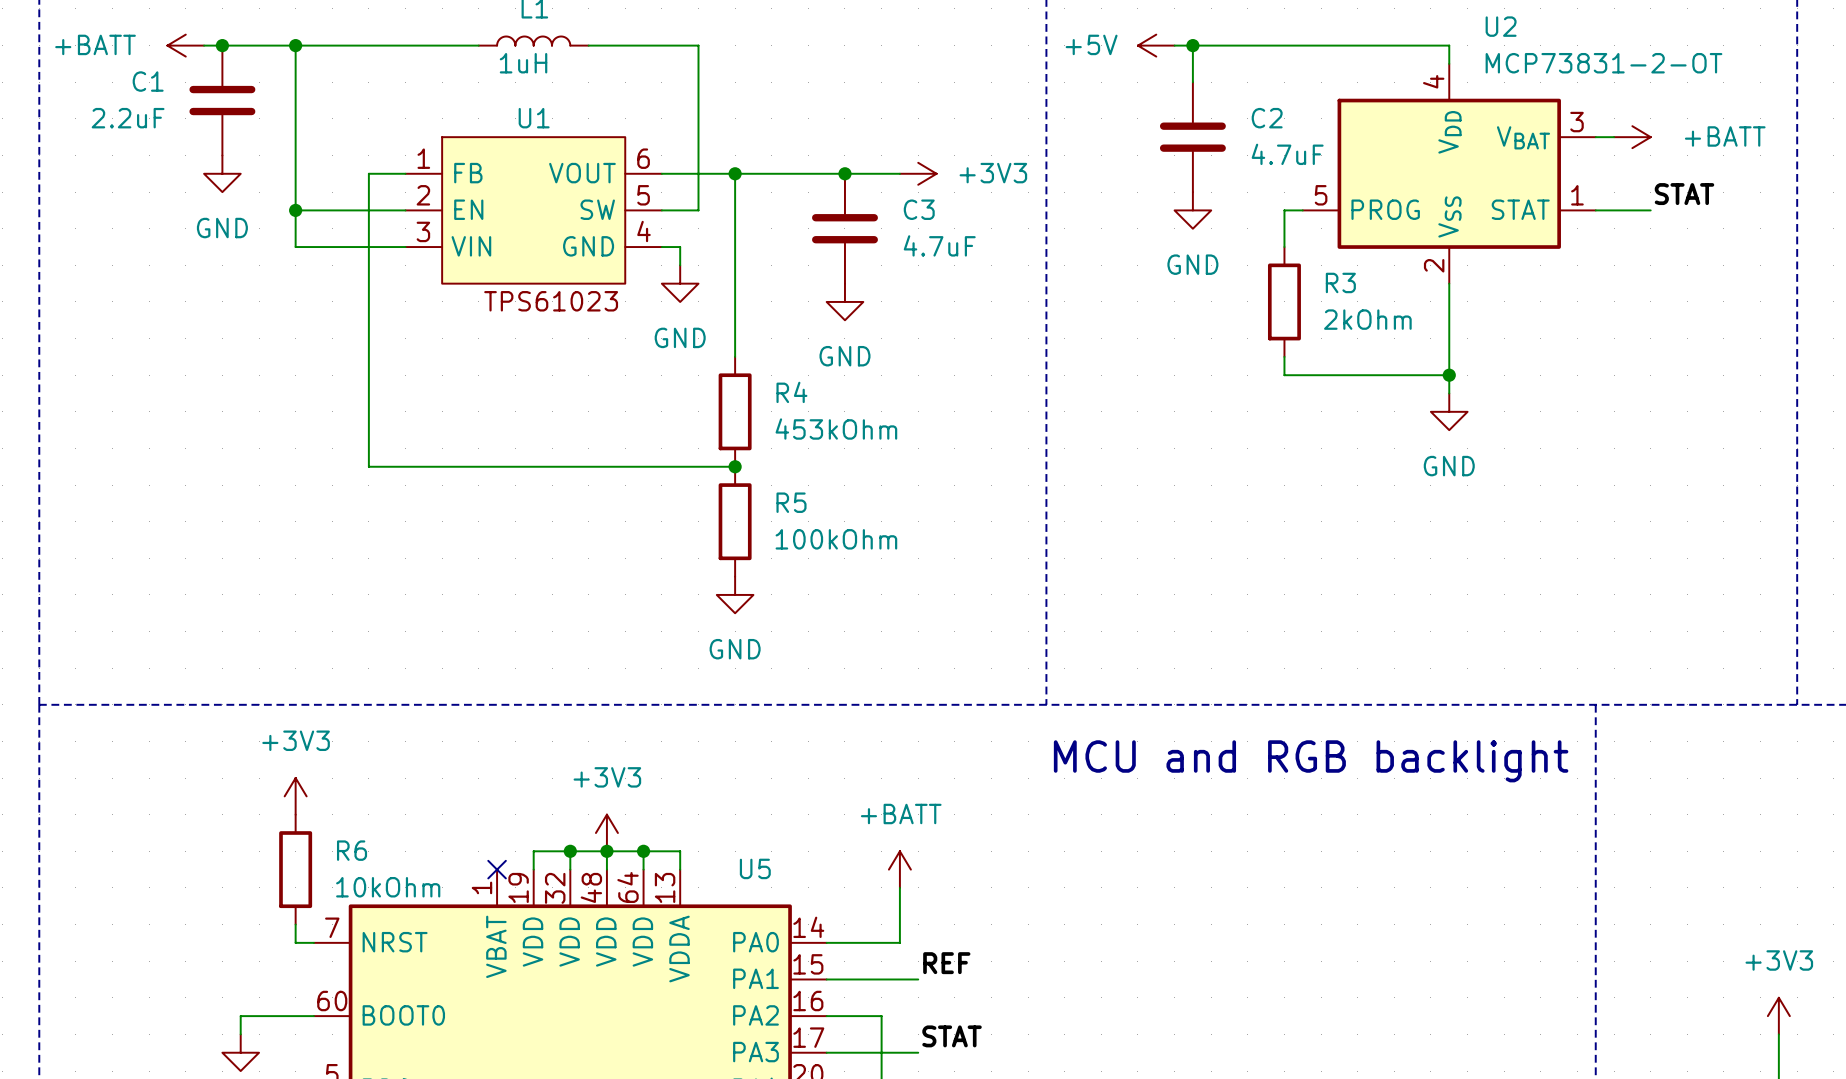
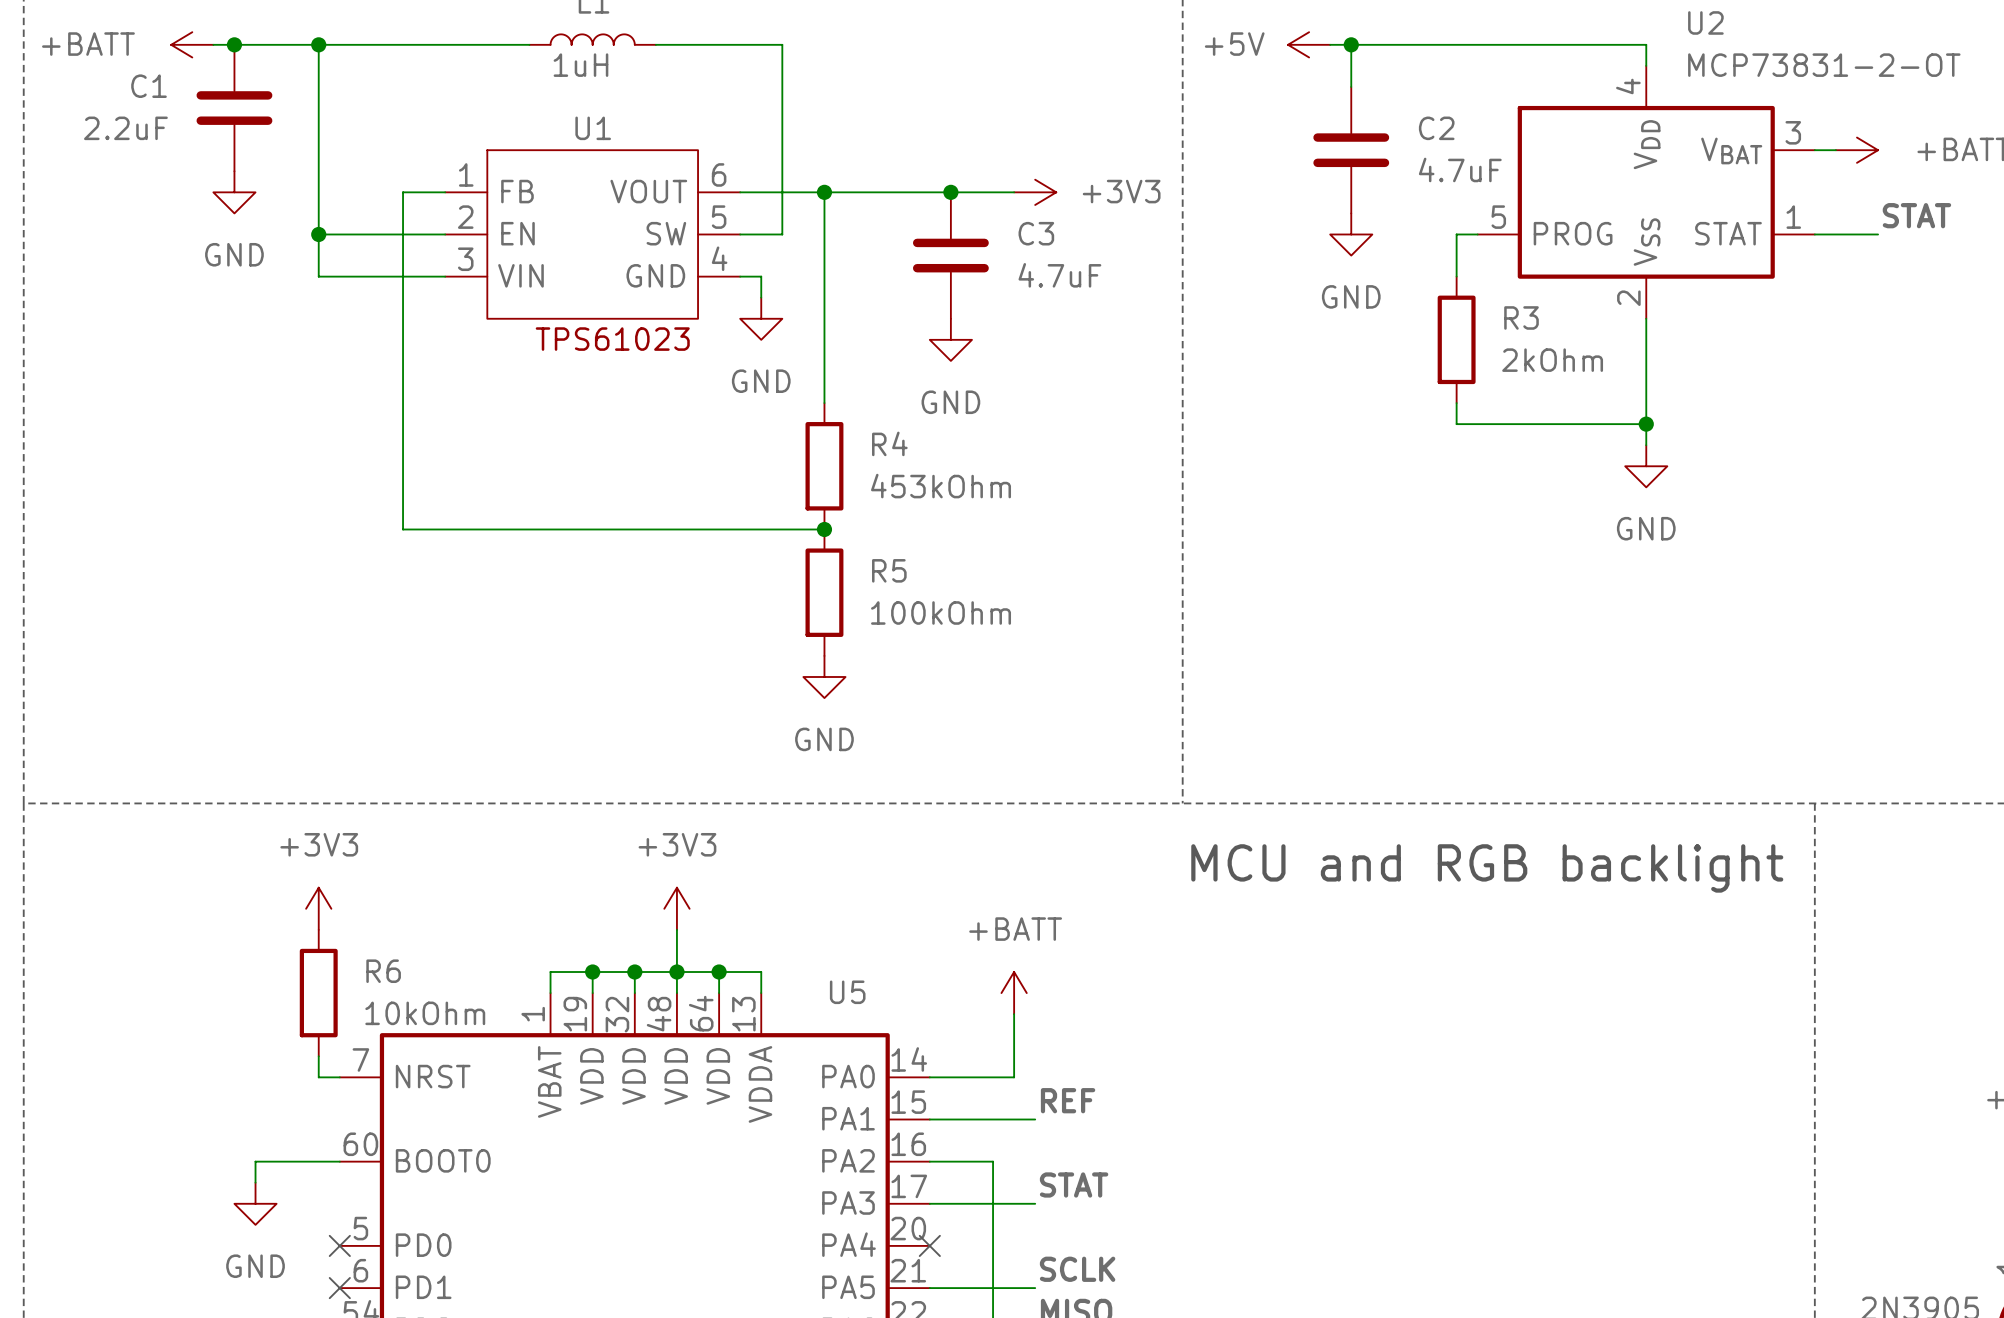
power symbol position: +3V3 (606, 832) -> +3V3 (676, 908)
wire: none -> (592, 972) (550, 972) (550, 993)
junction: none -> (592, 972)
no-connect mark: (497, 869) -> none

